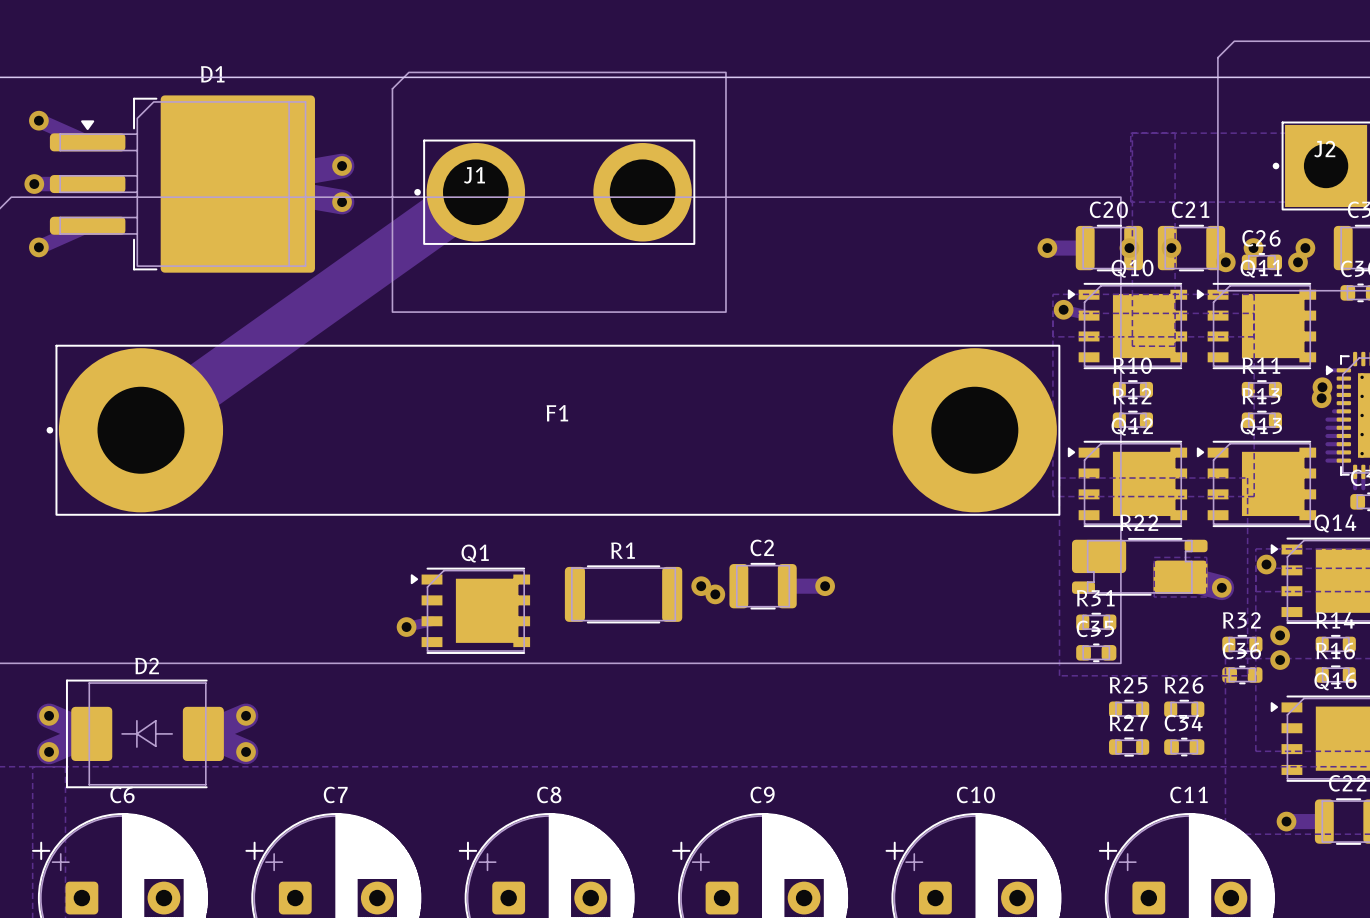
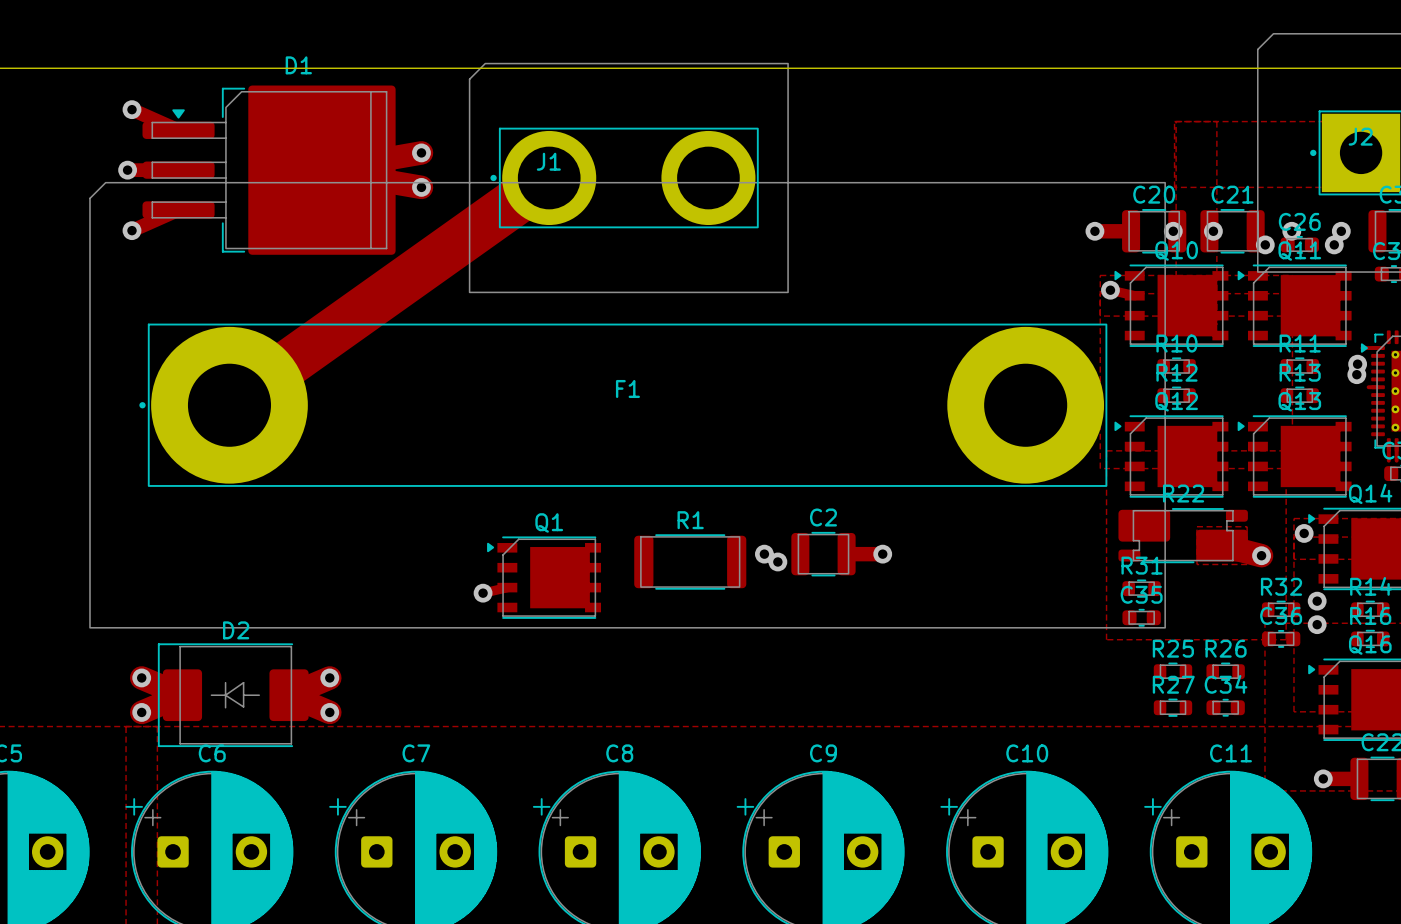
track: (1327, 419) (1343, 419) -> none
track: (1327, 427) (1343, 427) -> none
track: (1327, 436) (1343, 436) -> none
track: (1327, 444) (1343, 444) -> none
track: (1327, 452) (1343, 452) -> none
track: (1327, 460) (1343, 460) -> none

